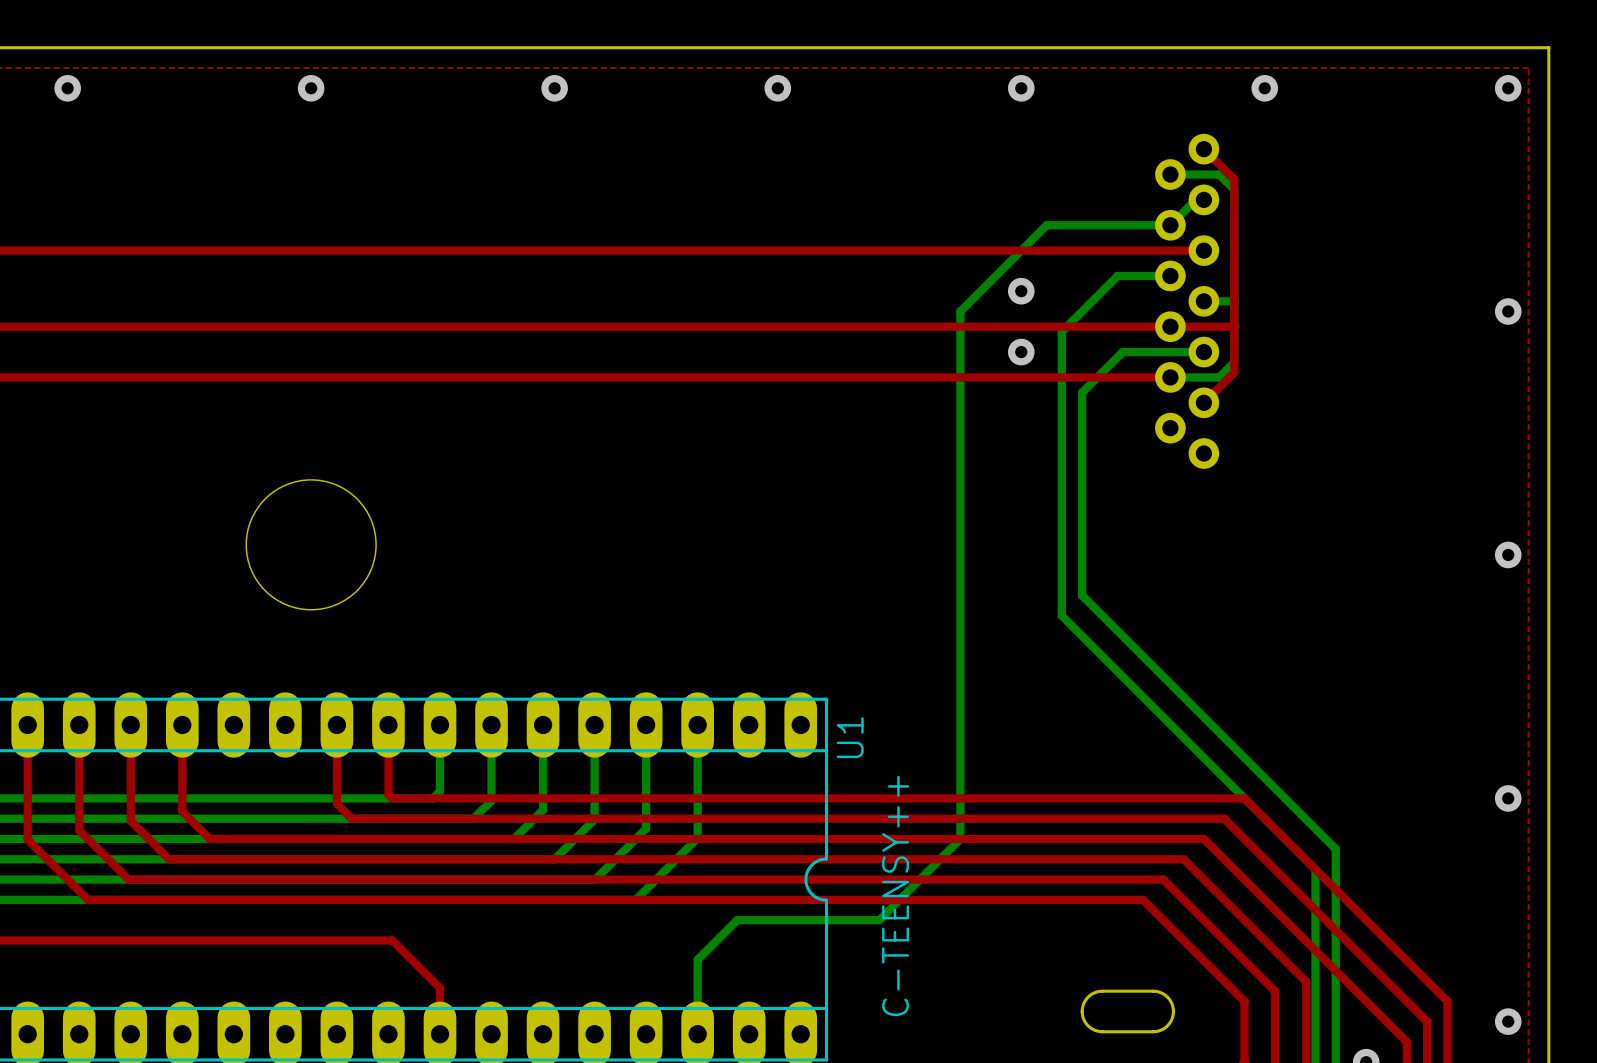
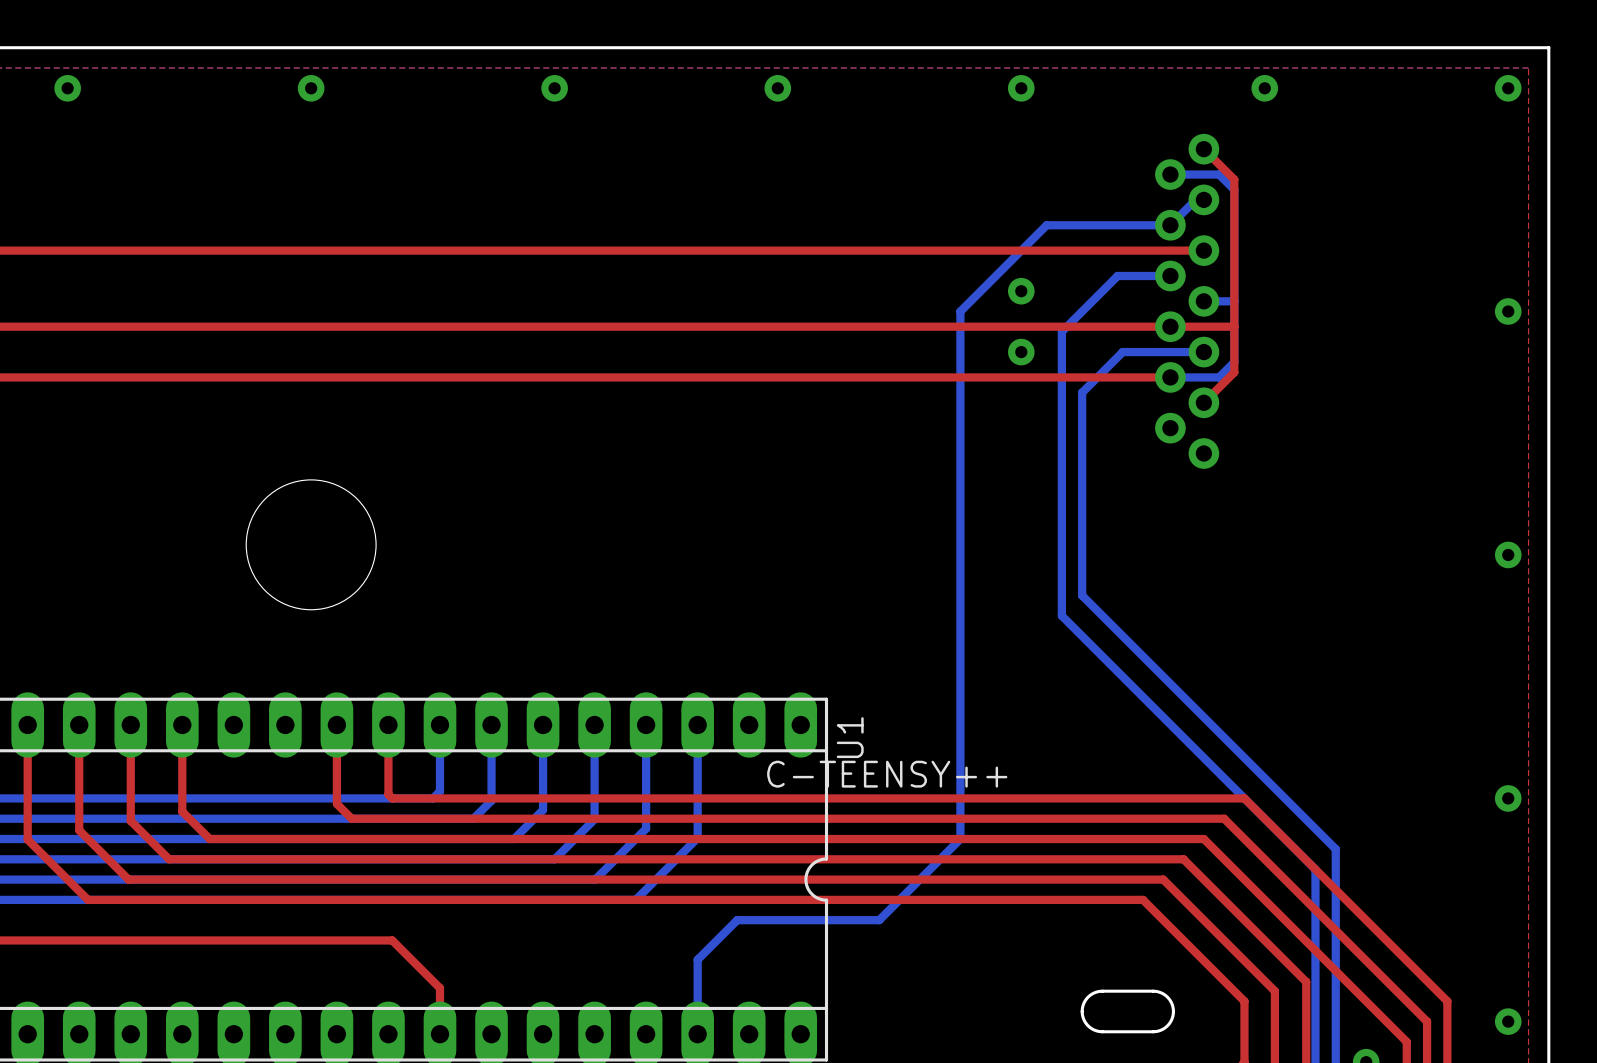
U1 value rotation: 0° (895, 896) -> 90° clockwise (887, 774)

